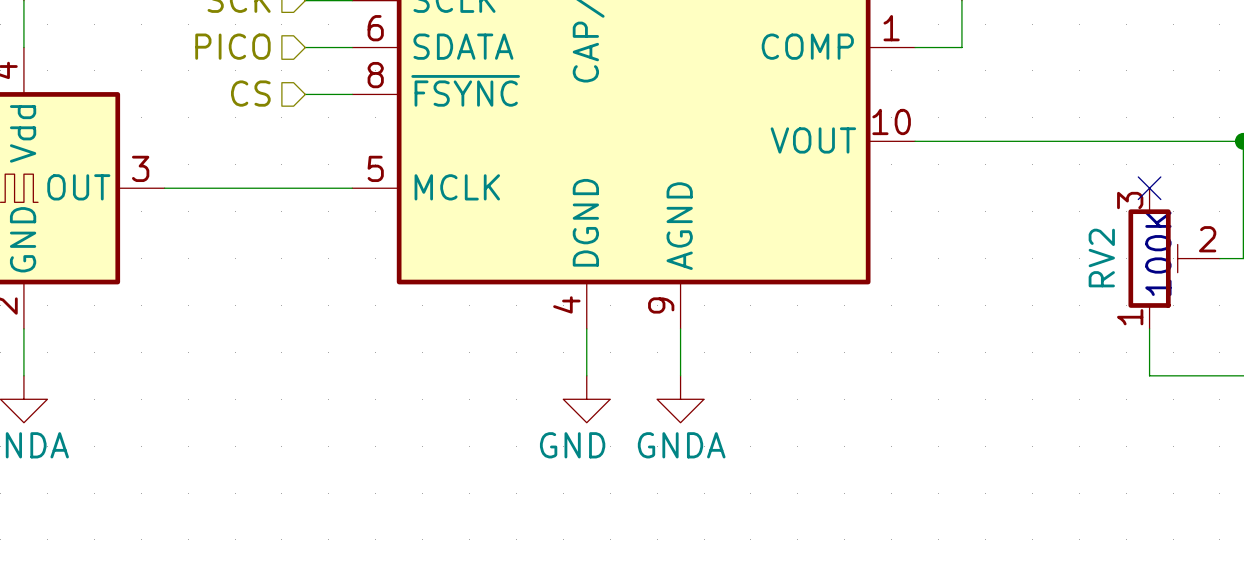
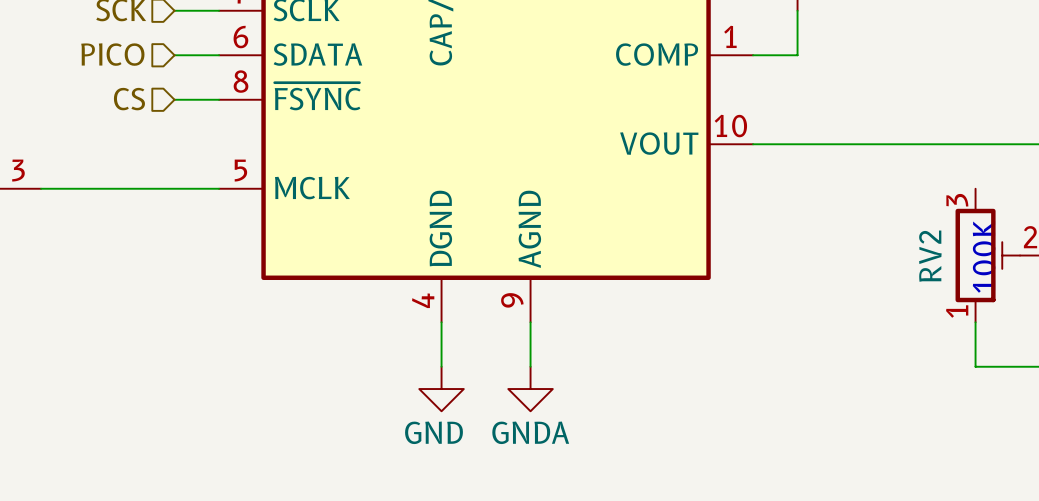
no-connect mark: (1149, 188) -> none

